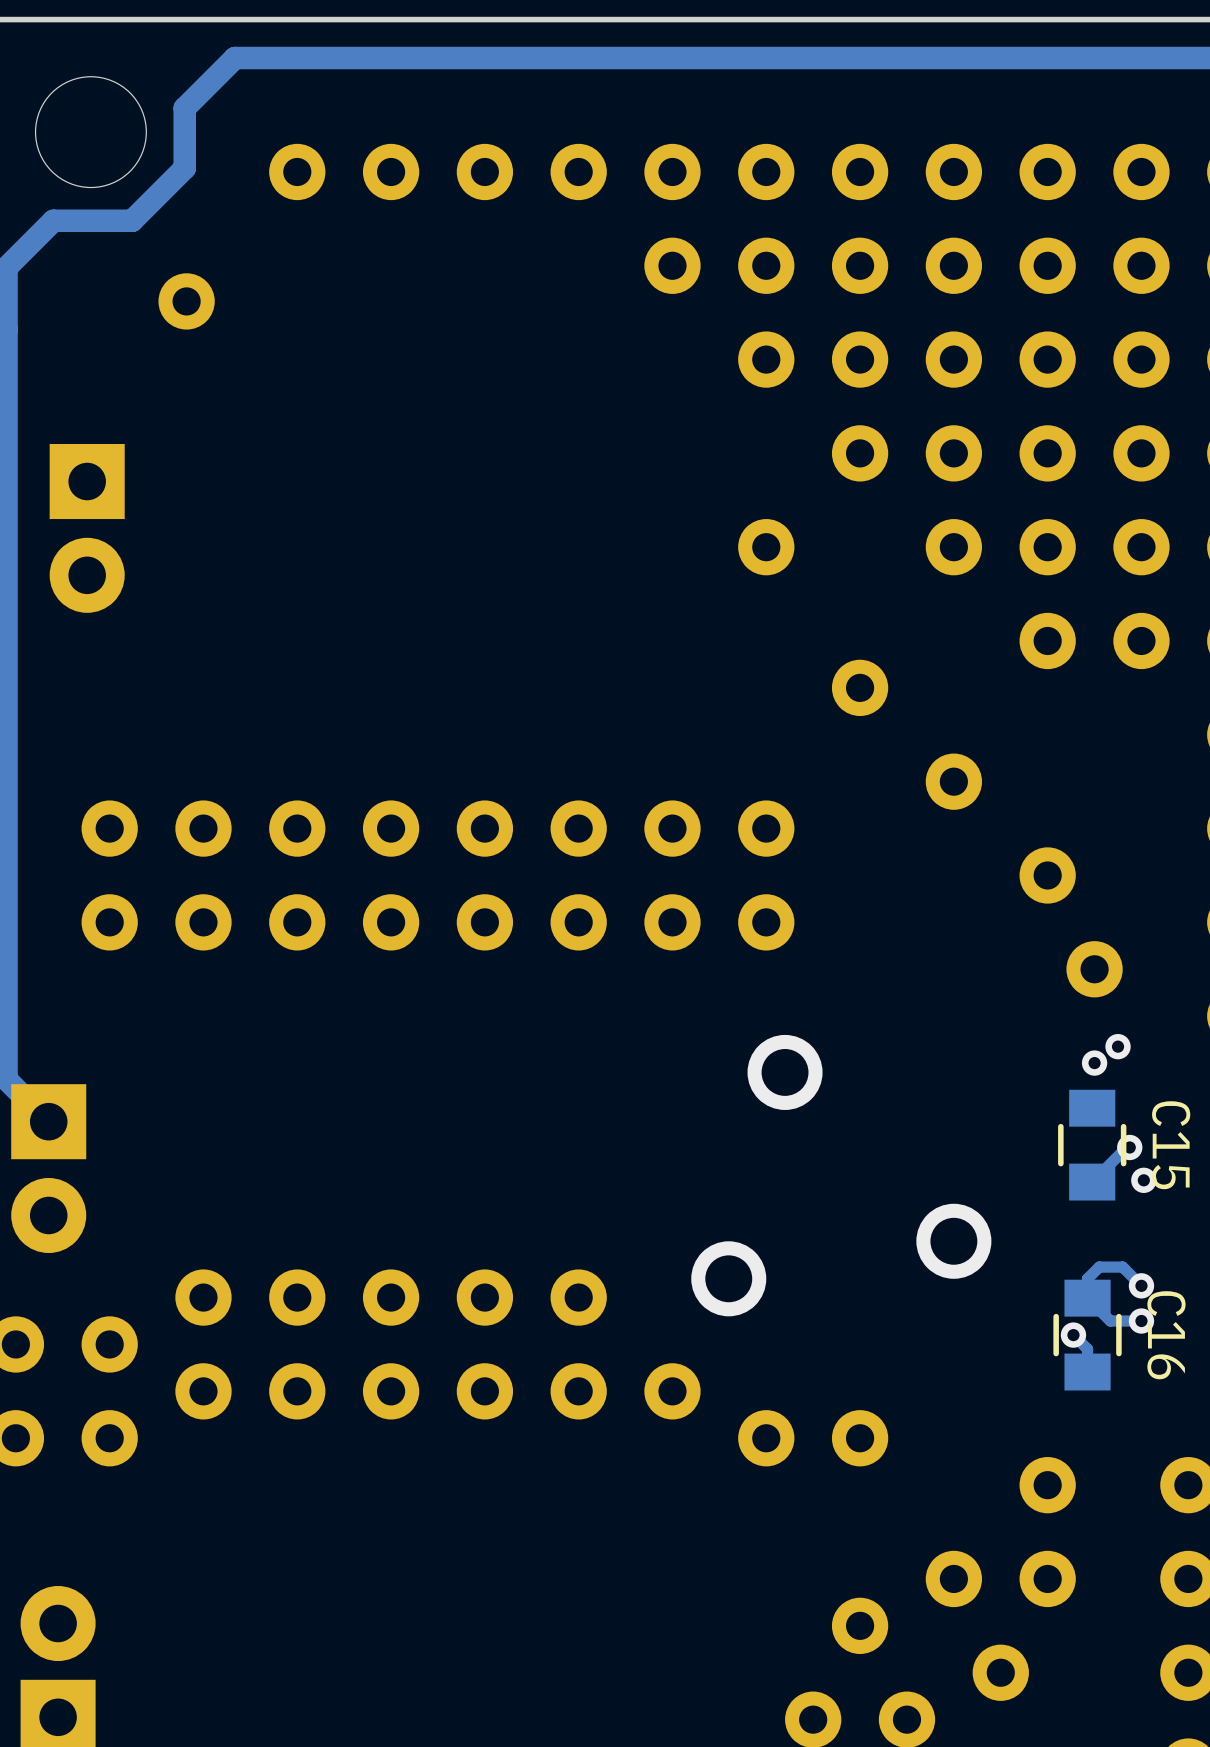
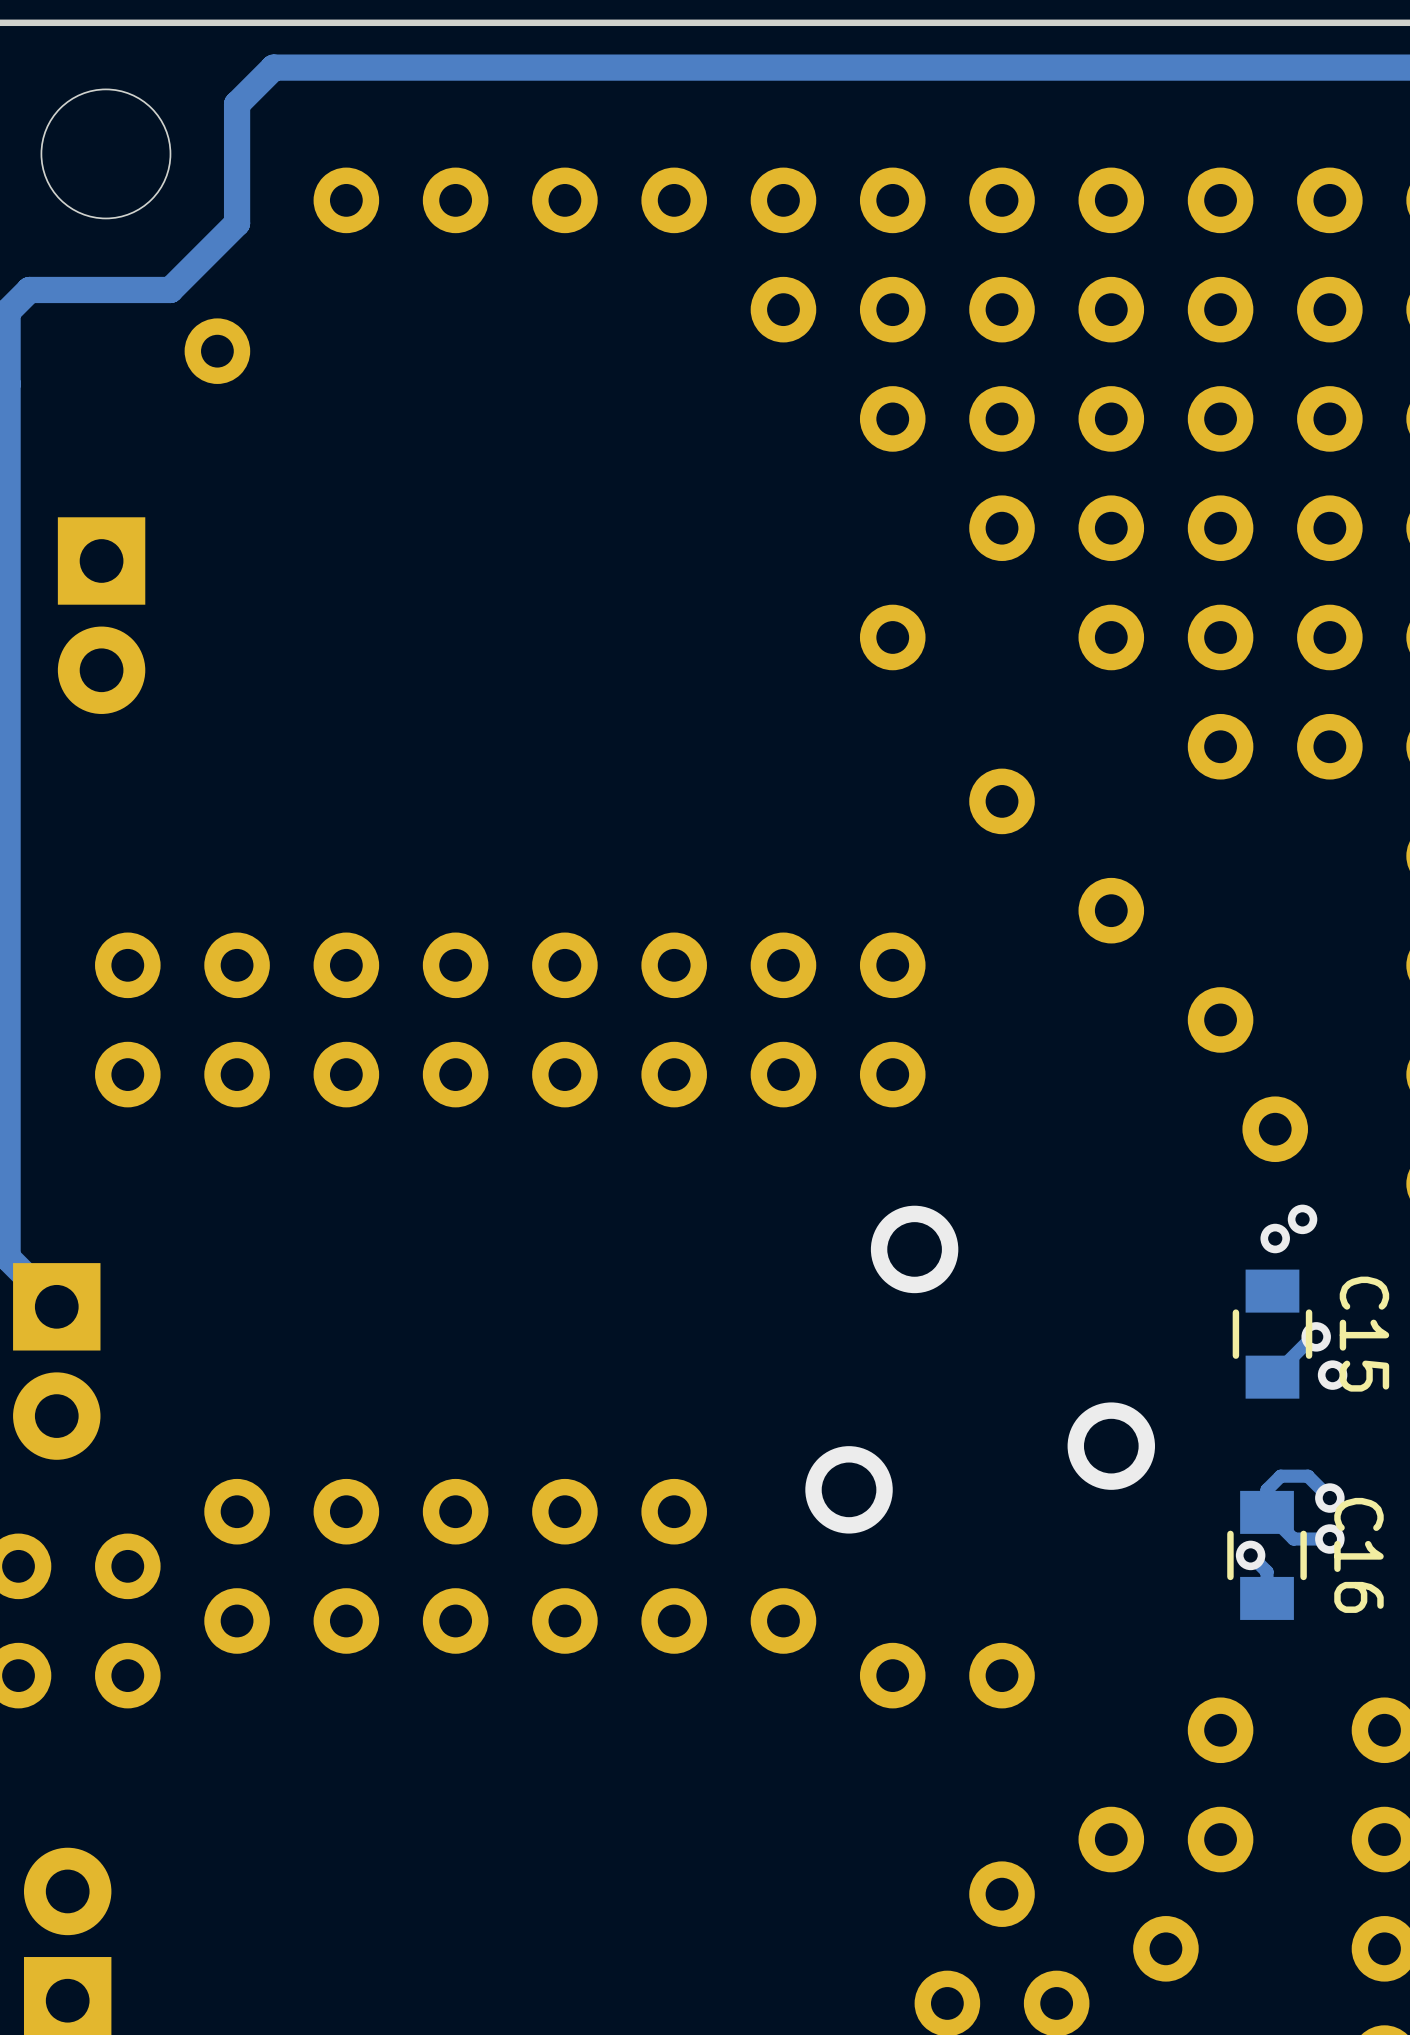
track: (203, 89) (184, 108) (184, 168) (132, 220) (53, 220) (25, 248) -> (237, 104) (237, 223) (170, 289) (29, 289)

